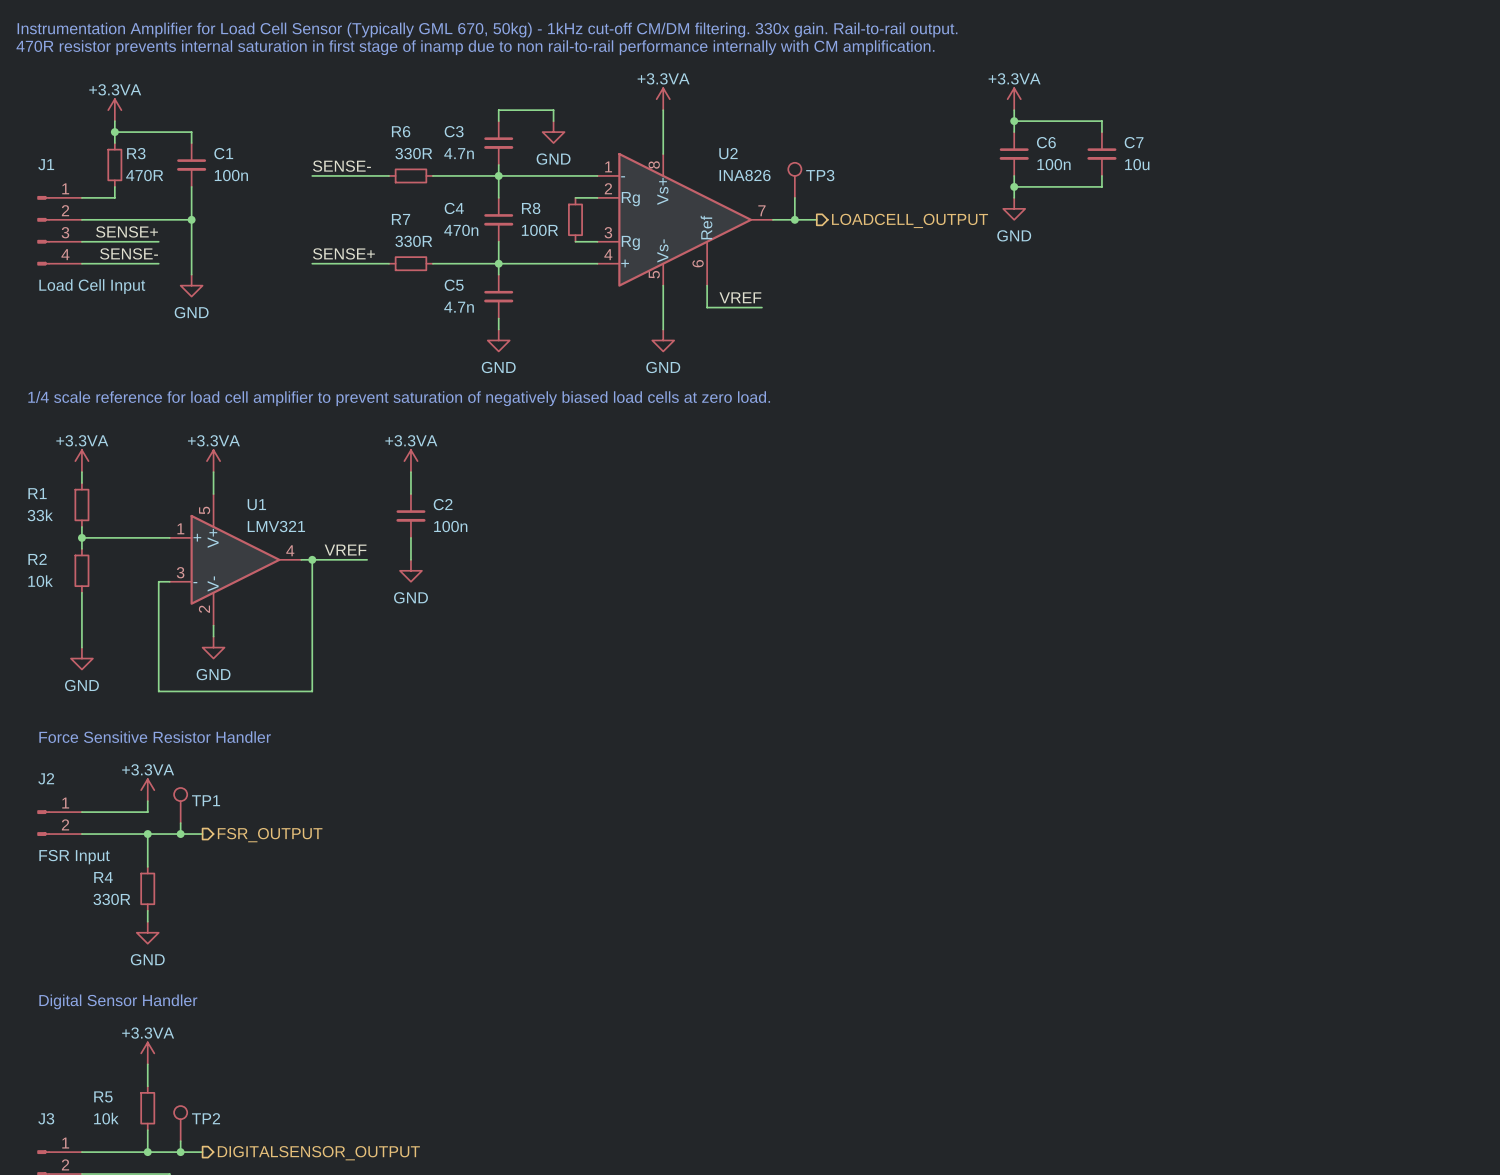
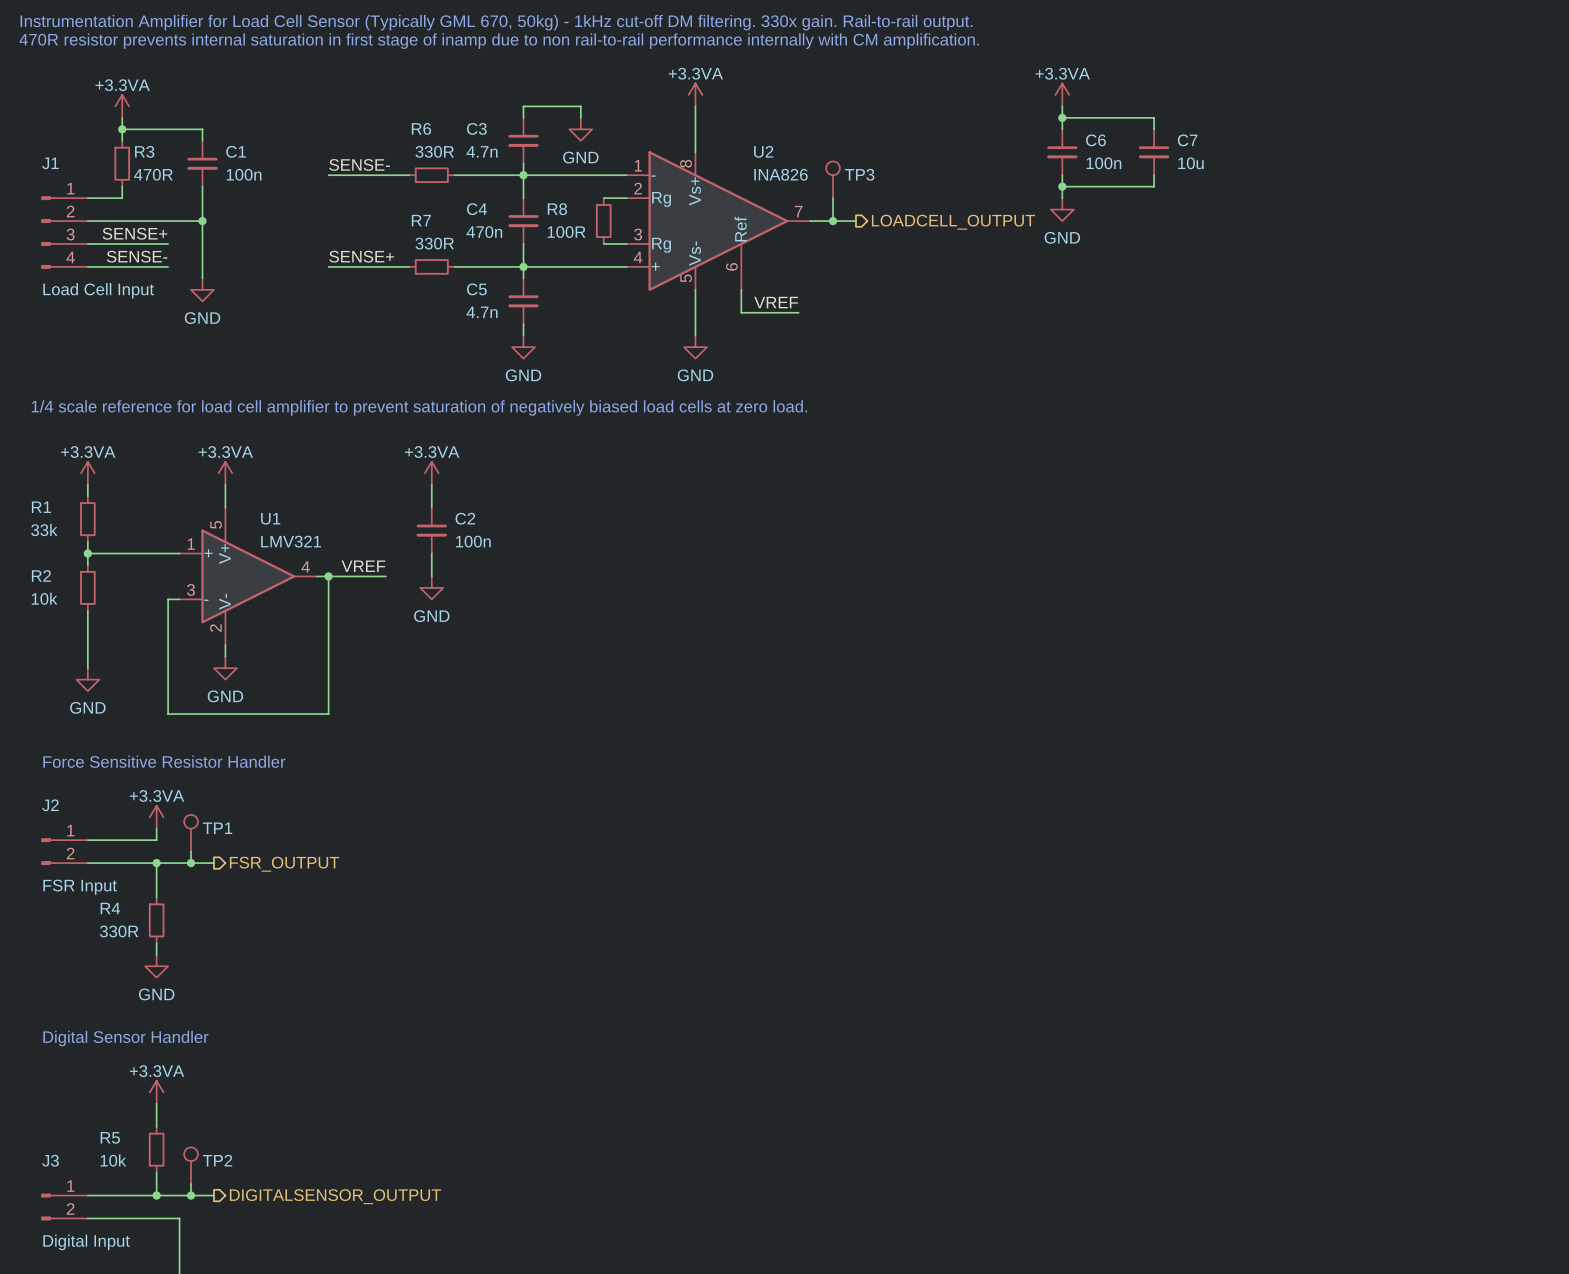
text: Instrumentation Amplifier for Load Cell Sensor (Typically GML 670, 50kg) - 1kHz cut-off CM/DM filtering. 330x gain. Rail-to-rail output. (487, 30) -> Instrumentation Amplifier for Load Cell Sensor (Typically GML 670, 50kg) - 1kHz cut-off DM filtering. 330x gain. Rail-to-rail output. (496, 22)

